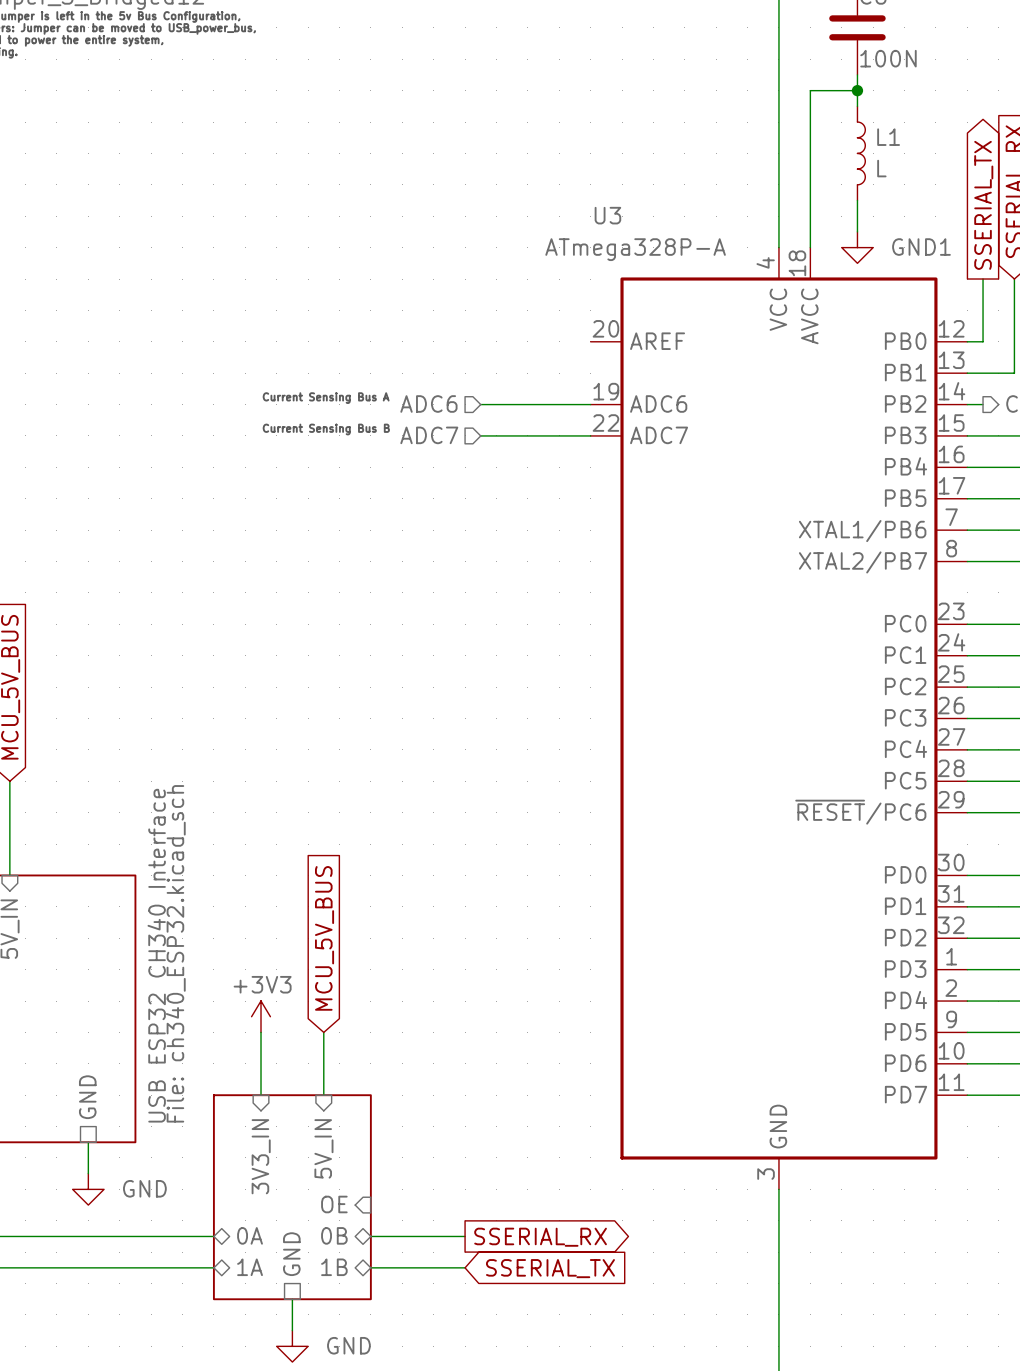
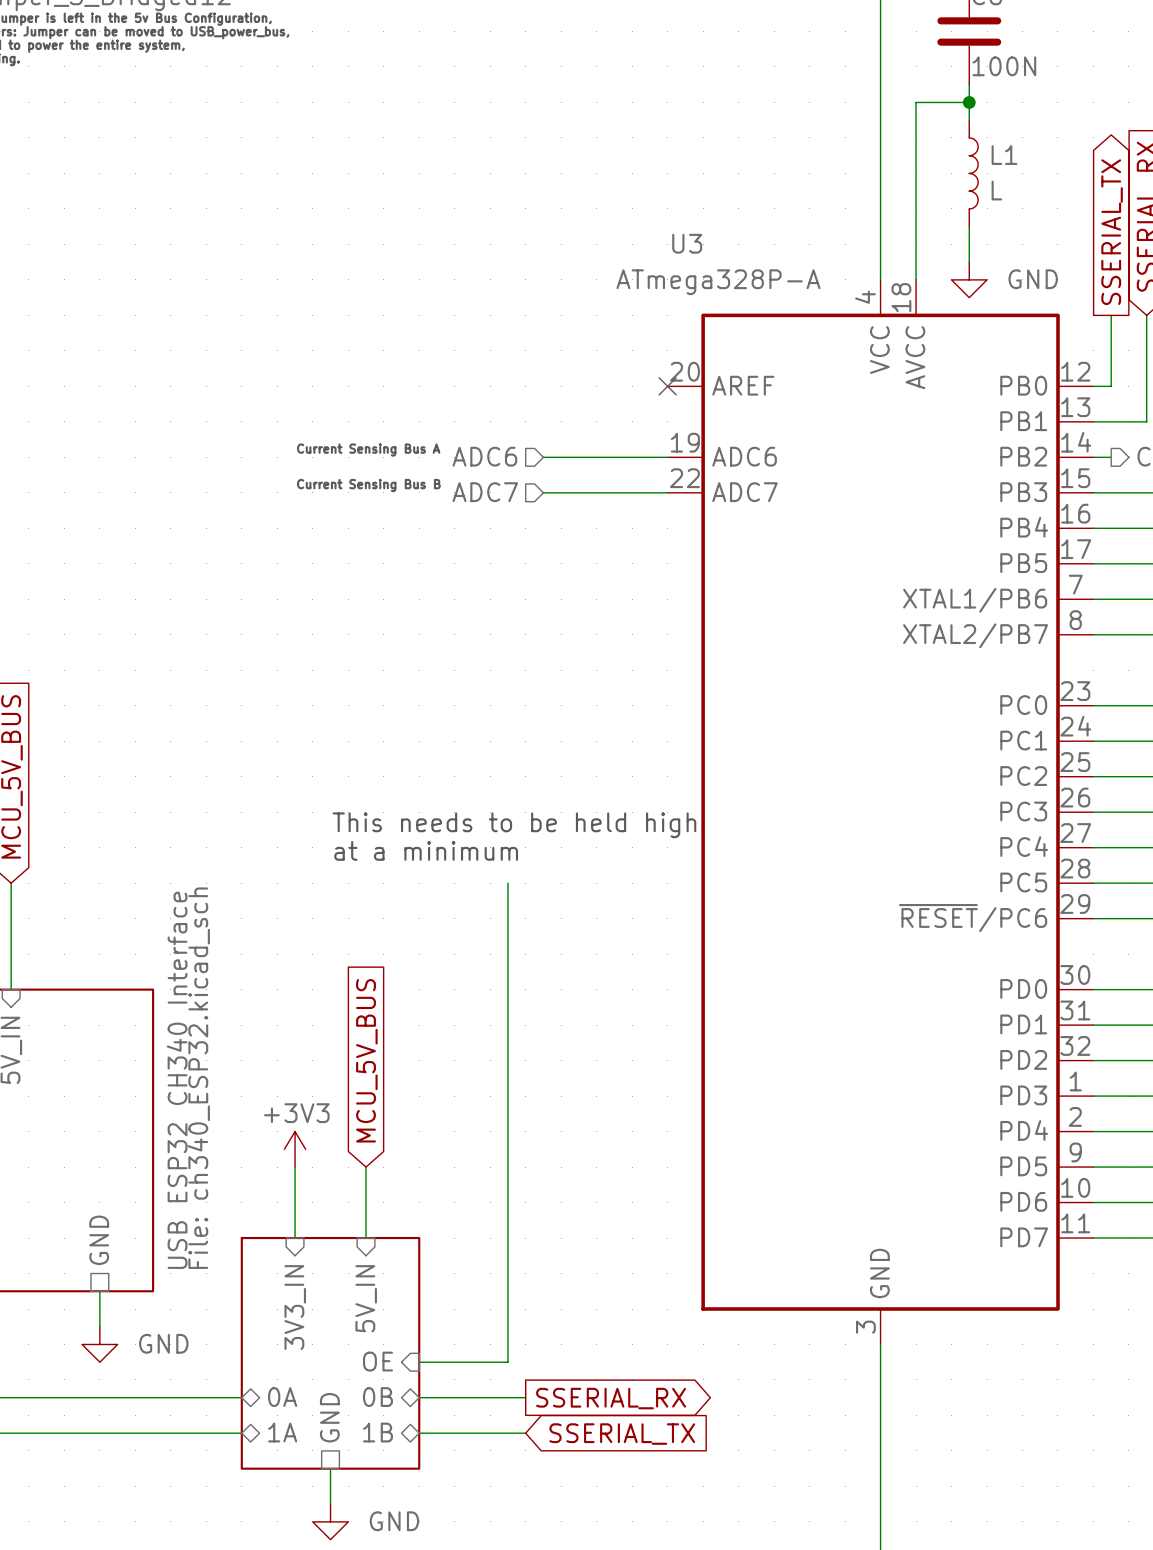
power symbol: GND1 (857, 247) -> GND (969, 279)
no-connect mark: none -> (667, 386)
text: none -> This needs to be held high (514, 825)
text: none -> at a minimum (426, 850)
wire: none -> (507, 883) (507, 1362) (419, 1362)

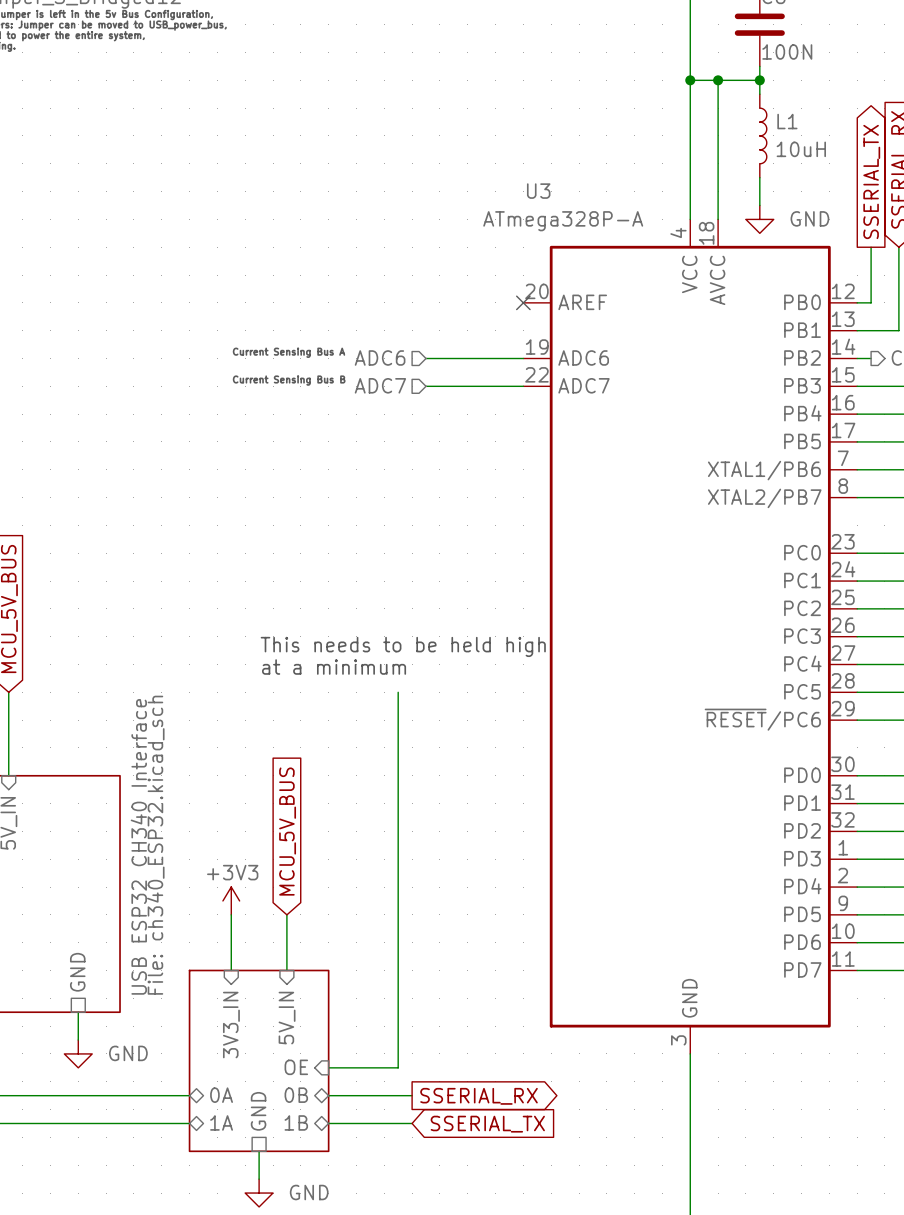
wire: none -> (690, 80) (718, 80)
junction: none -> (690, 80)
junction: none -> (718, 80)
L1 value: L (996, 190) -> 10uH (801, 149)

